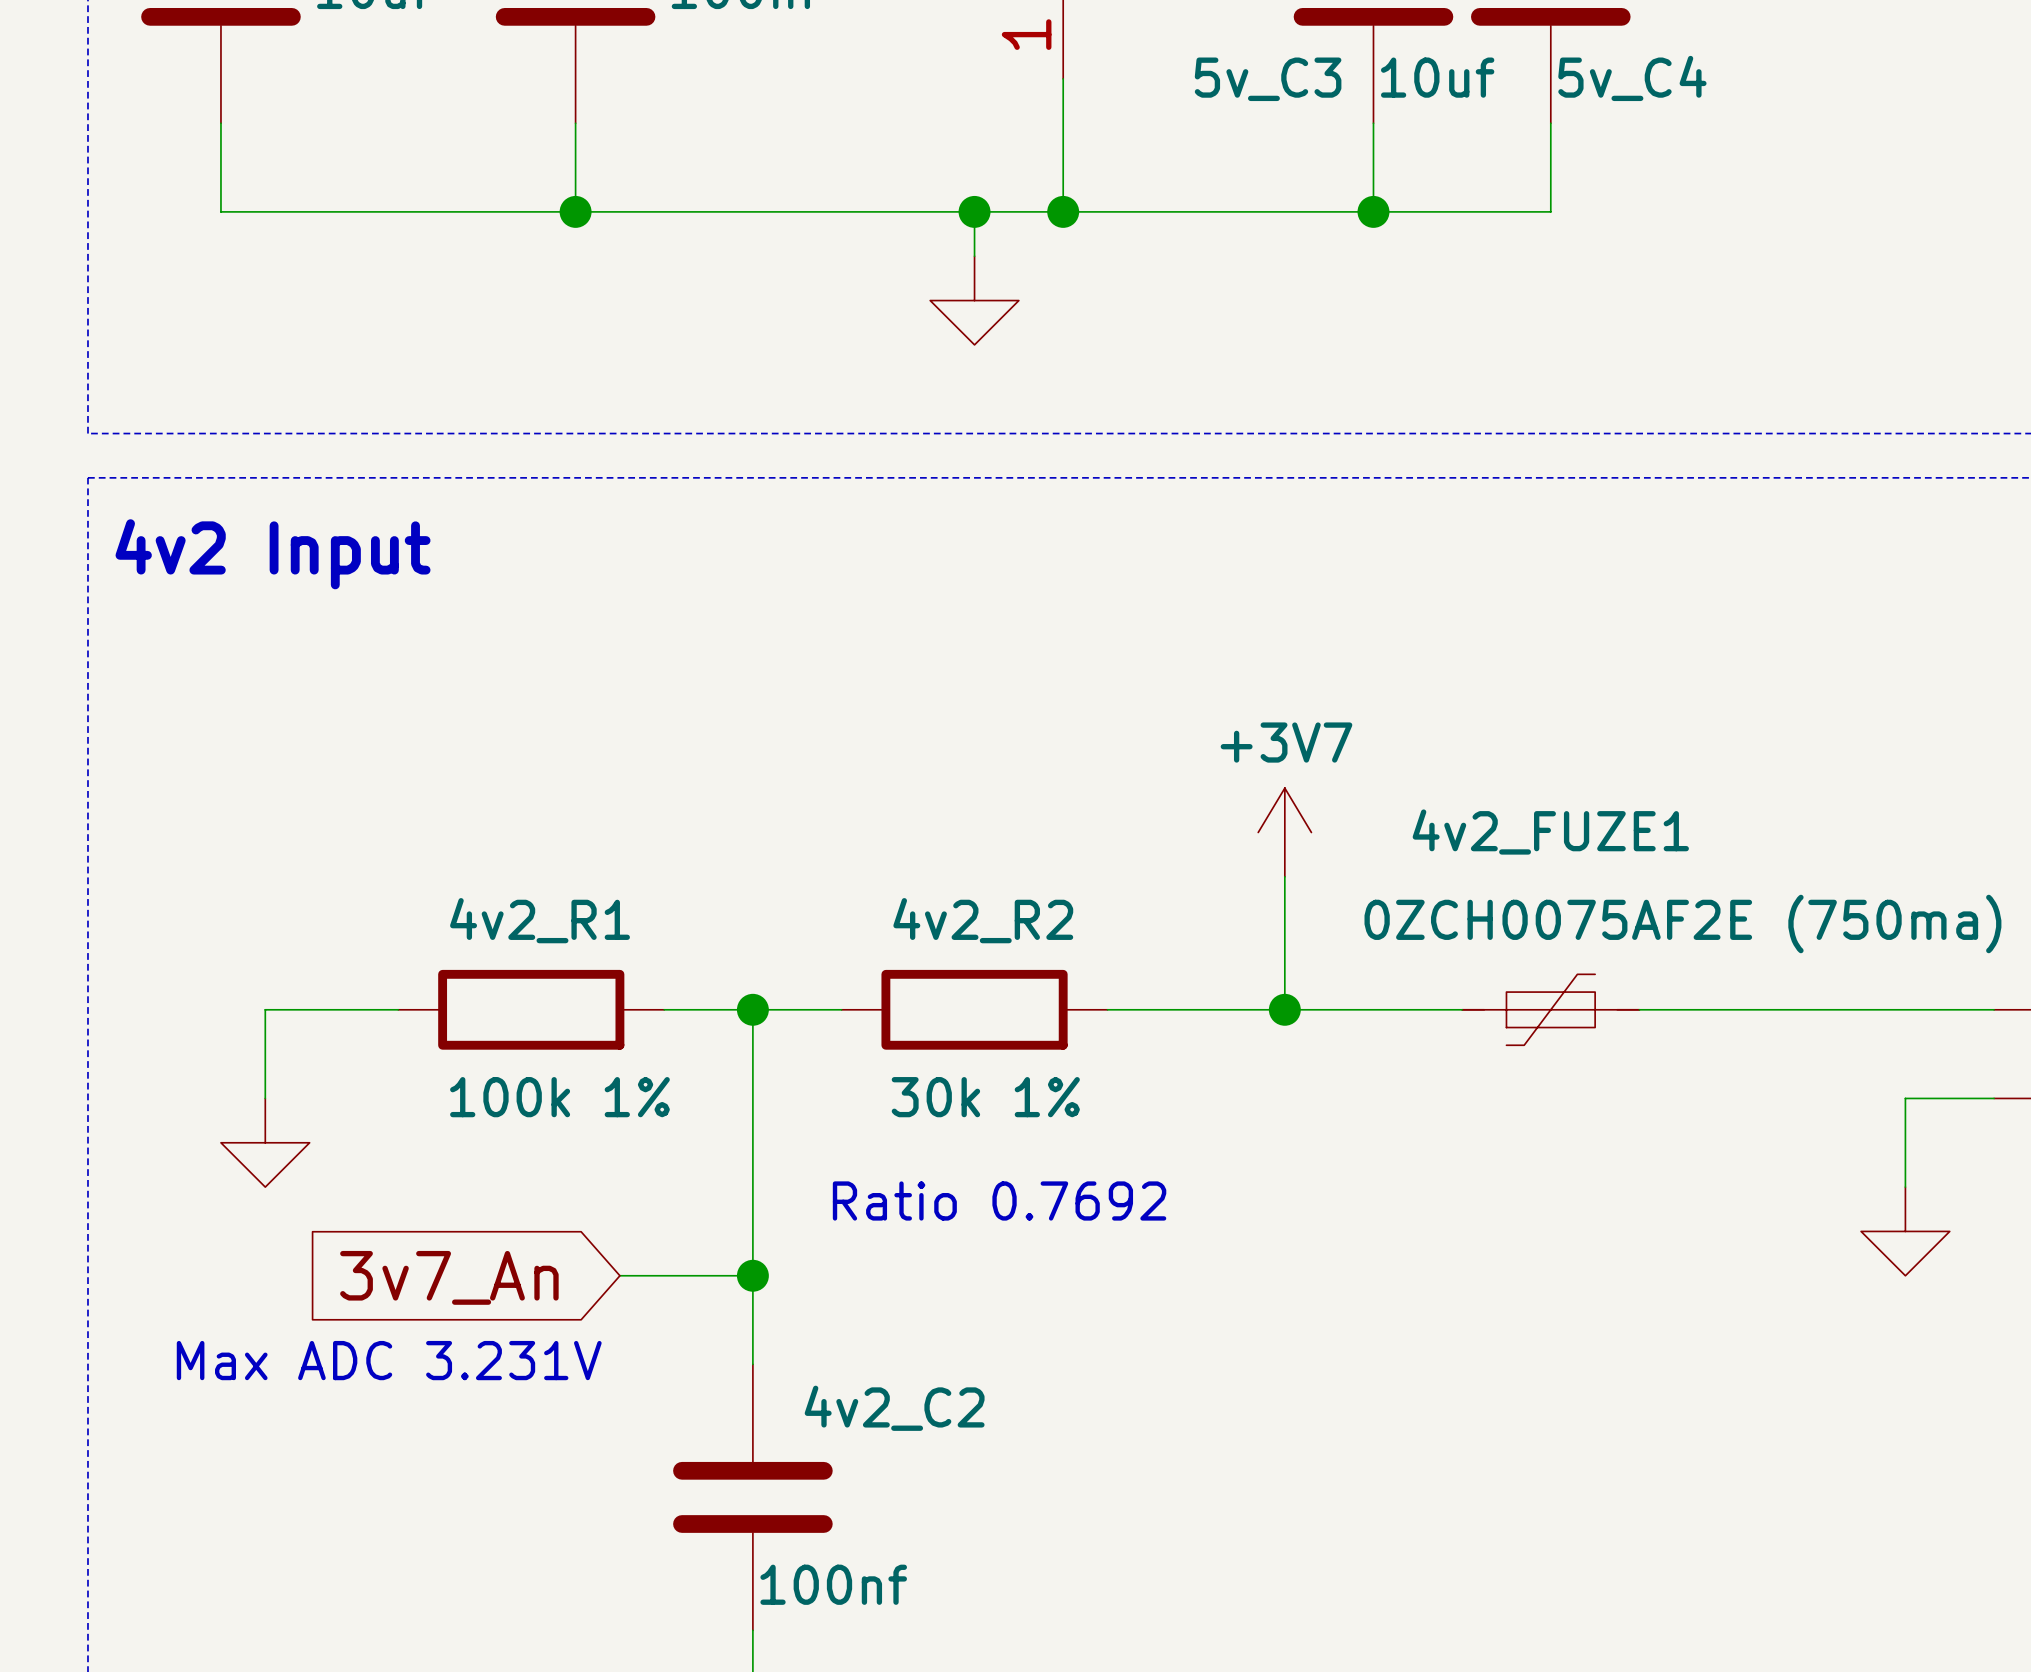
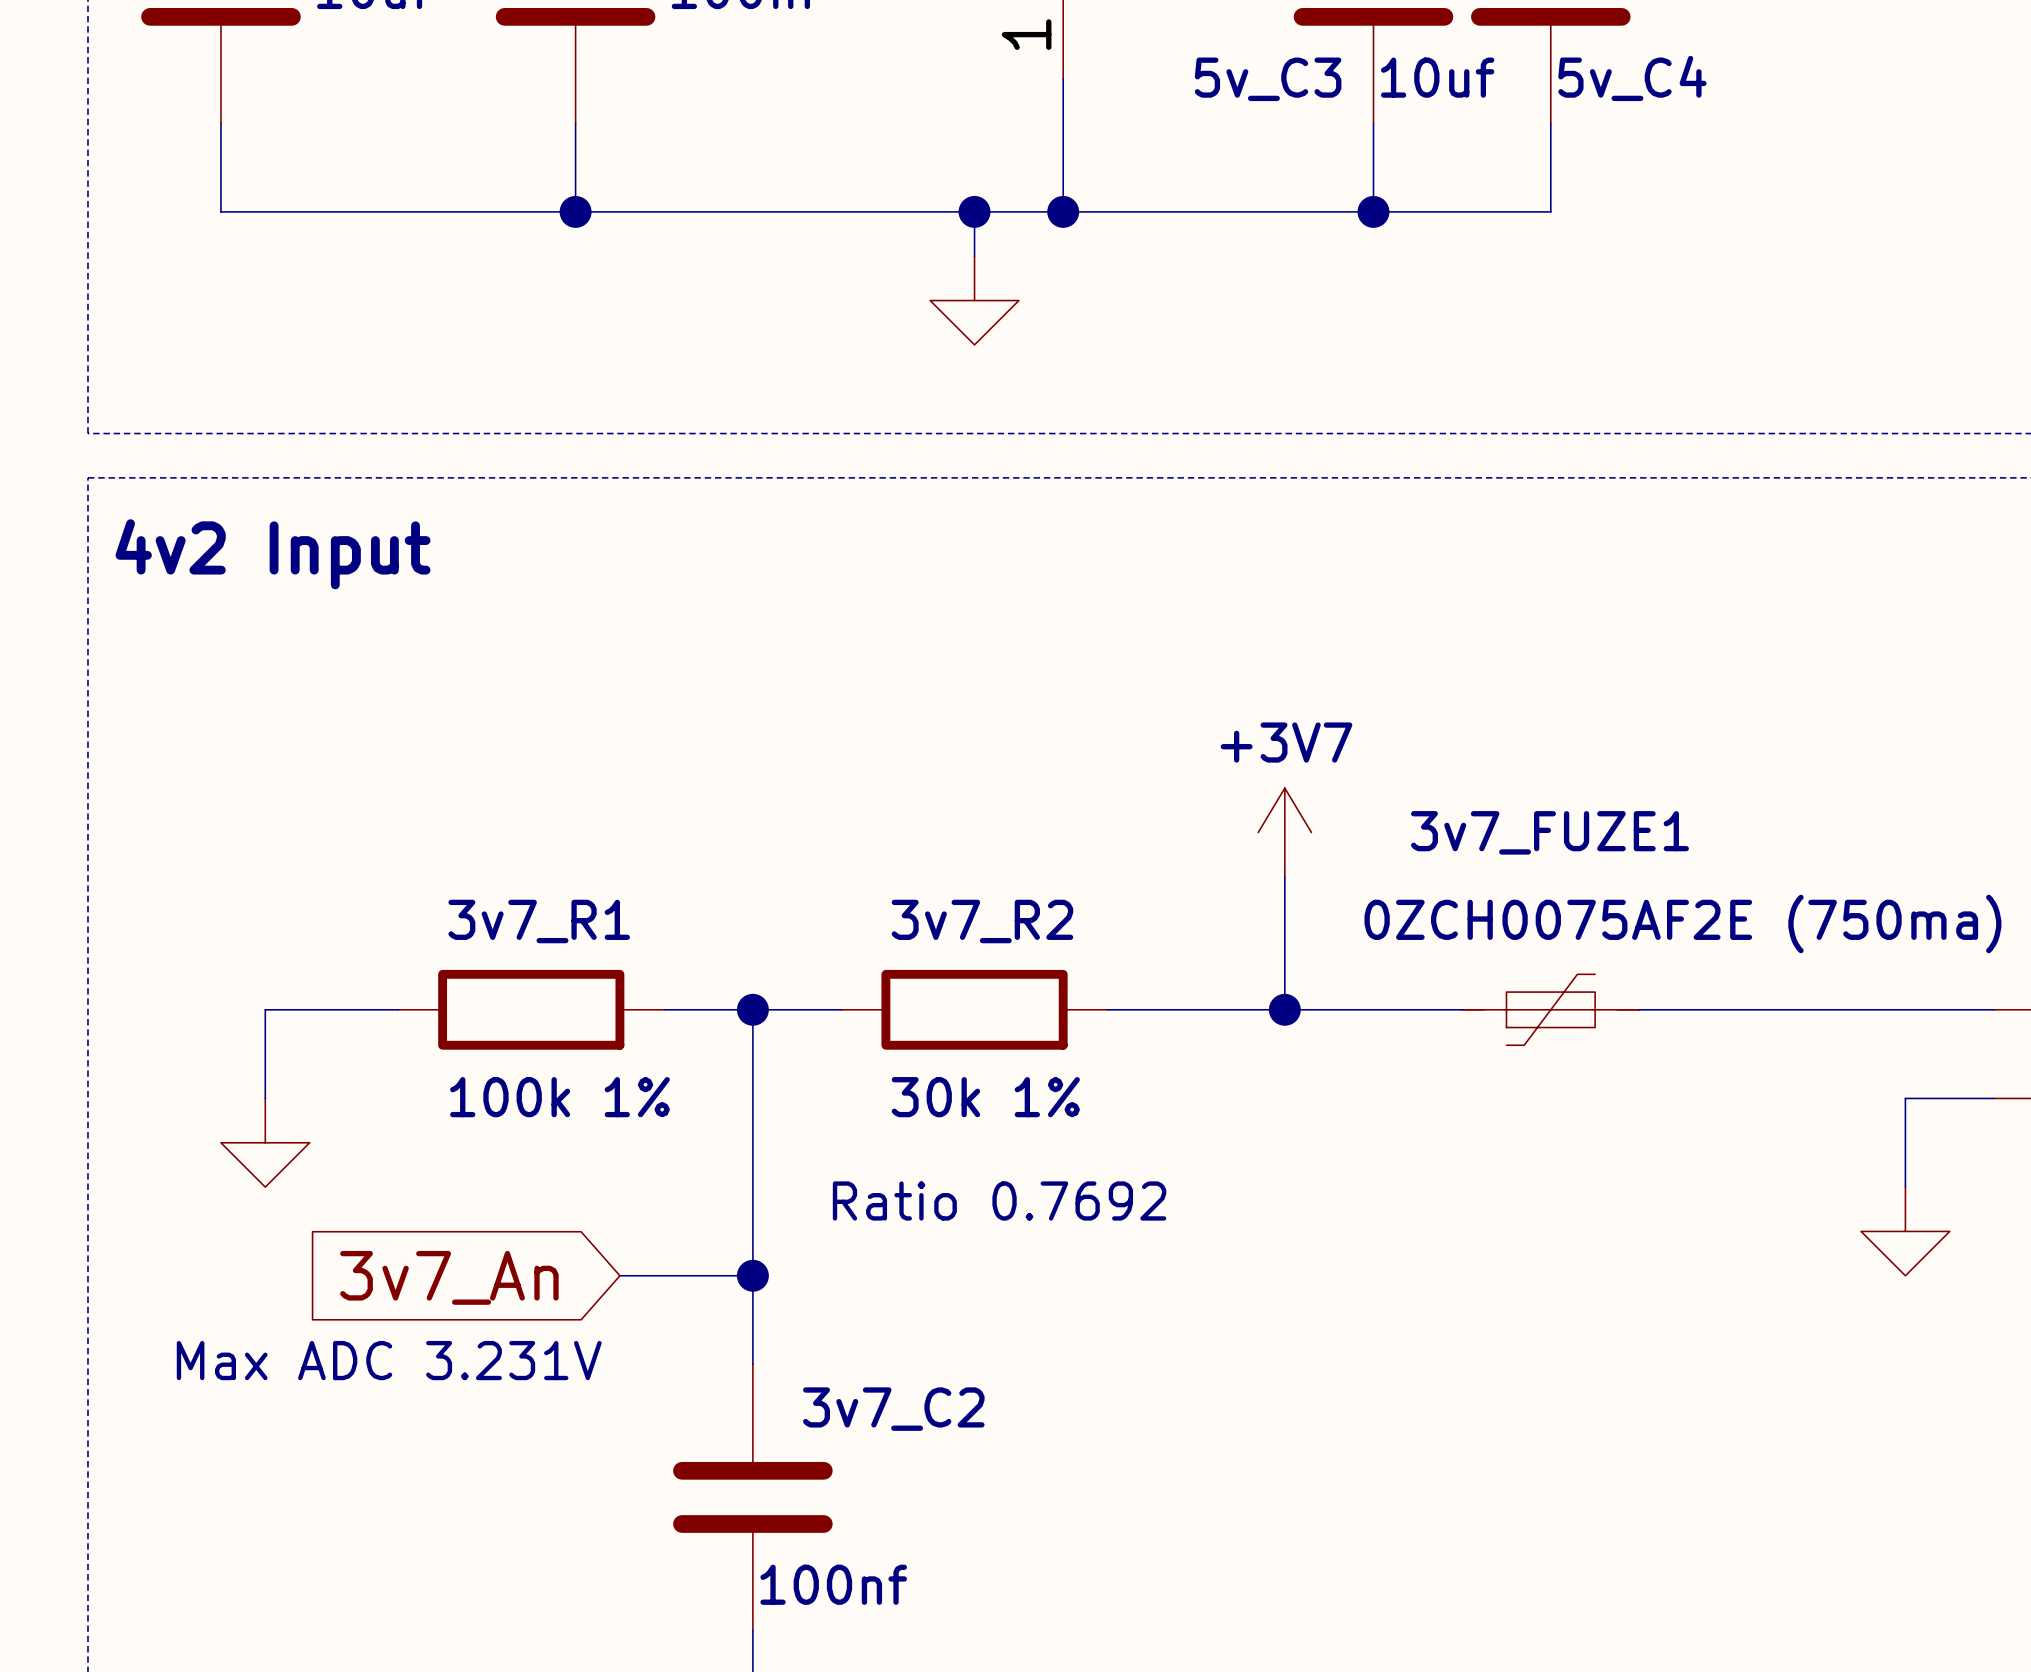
4v2_FUZE1 name: 4v2_FUZE1 (1550, 832) -> 3v7_FUZE1 (1549, 832)
4v2_R1 name: 4v2_R1 (540, 920) -> 3v7_R1 (539, 921)
4v2_R2 name: 4v2_R2 (983, 920) -> 3v7_R2 (982, 921)
4v2_C2 name: 4v2_C2 (894, 1408) -> 3v7_C2 (893, 1409)

